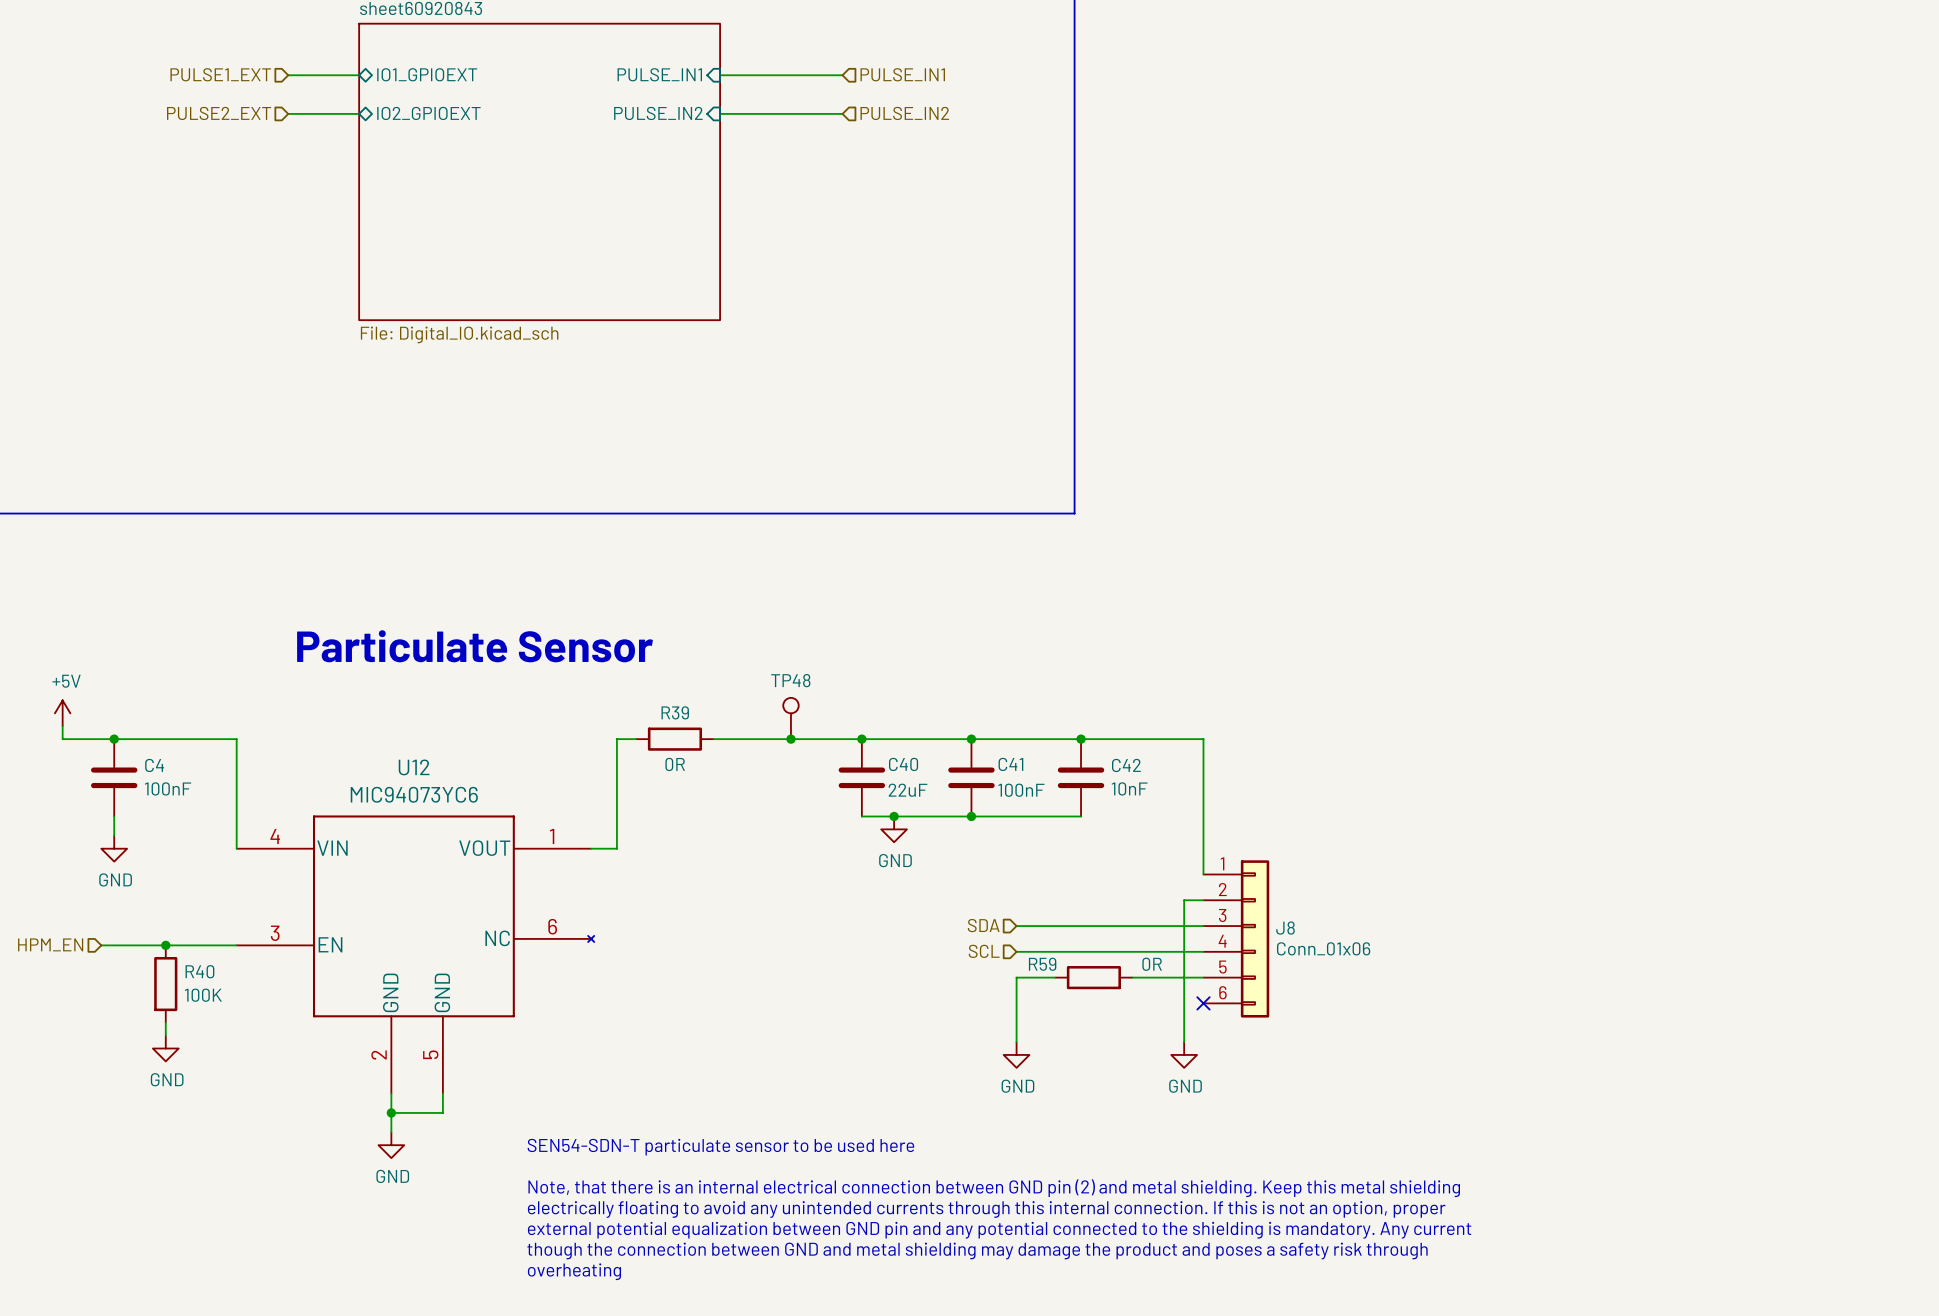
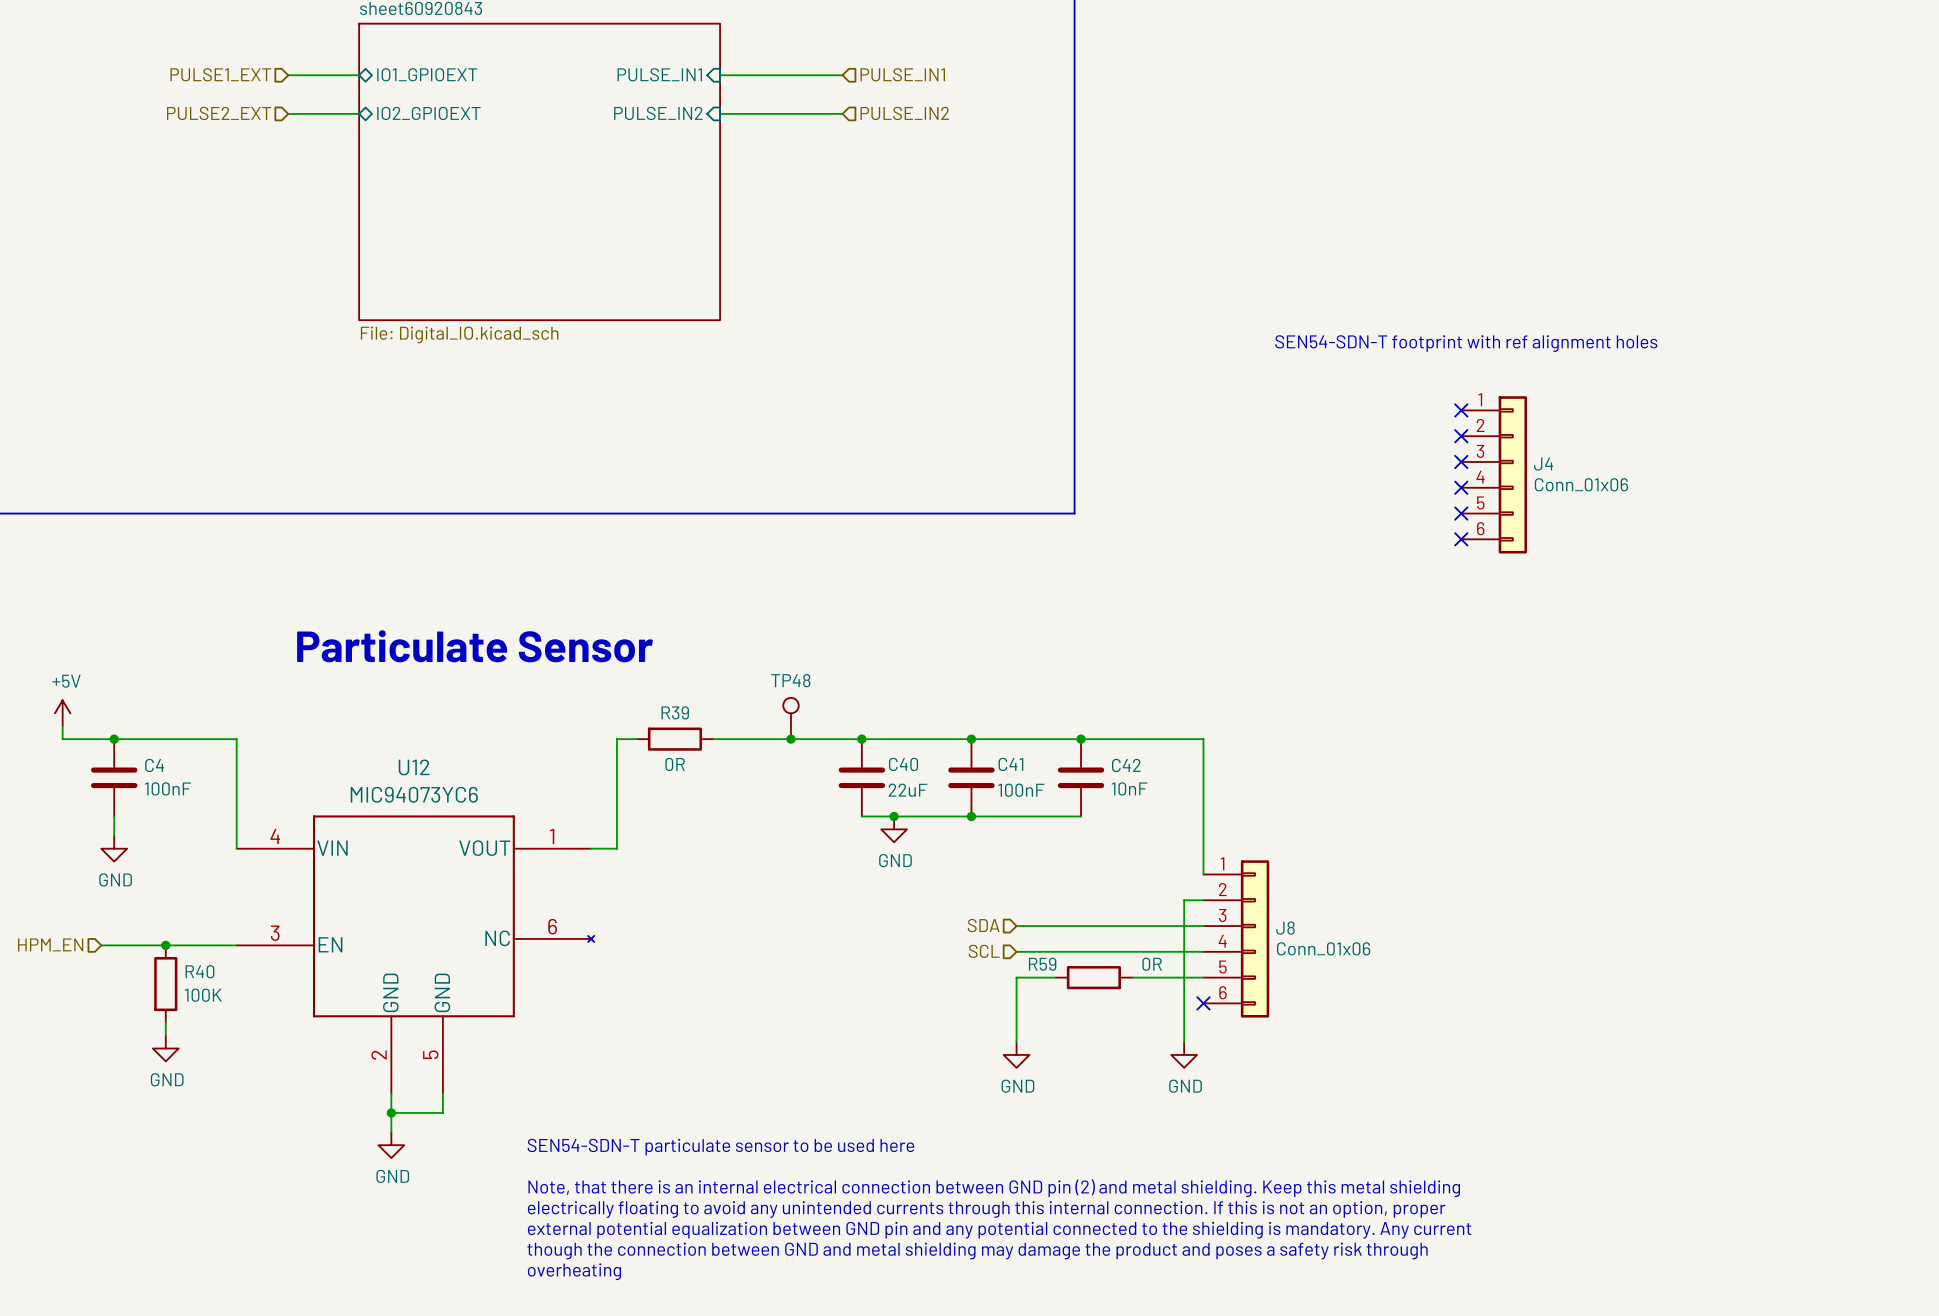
text: none -> SEN54-SDN-T footprint with ref alignment holes (1466, 343)
no-connect mark: none -> (1461, 410)
no-connect mark: none -> (1461, 436)
no-connect mark: none -> (1461, 461)
J4: none -> Conn_01x06 (1494, 474)
no-connect mark: none -> (1461, 487)
no-connect mark: none -> (1461, 513)
no-connect mark: none -> (1461, 539)

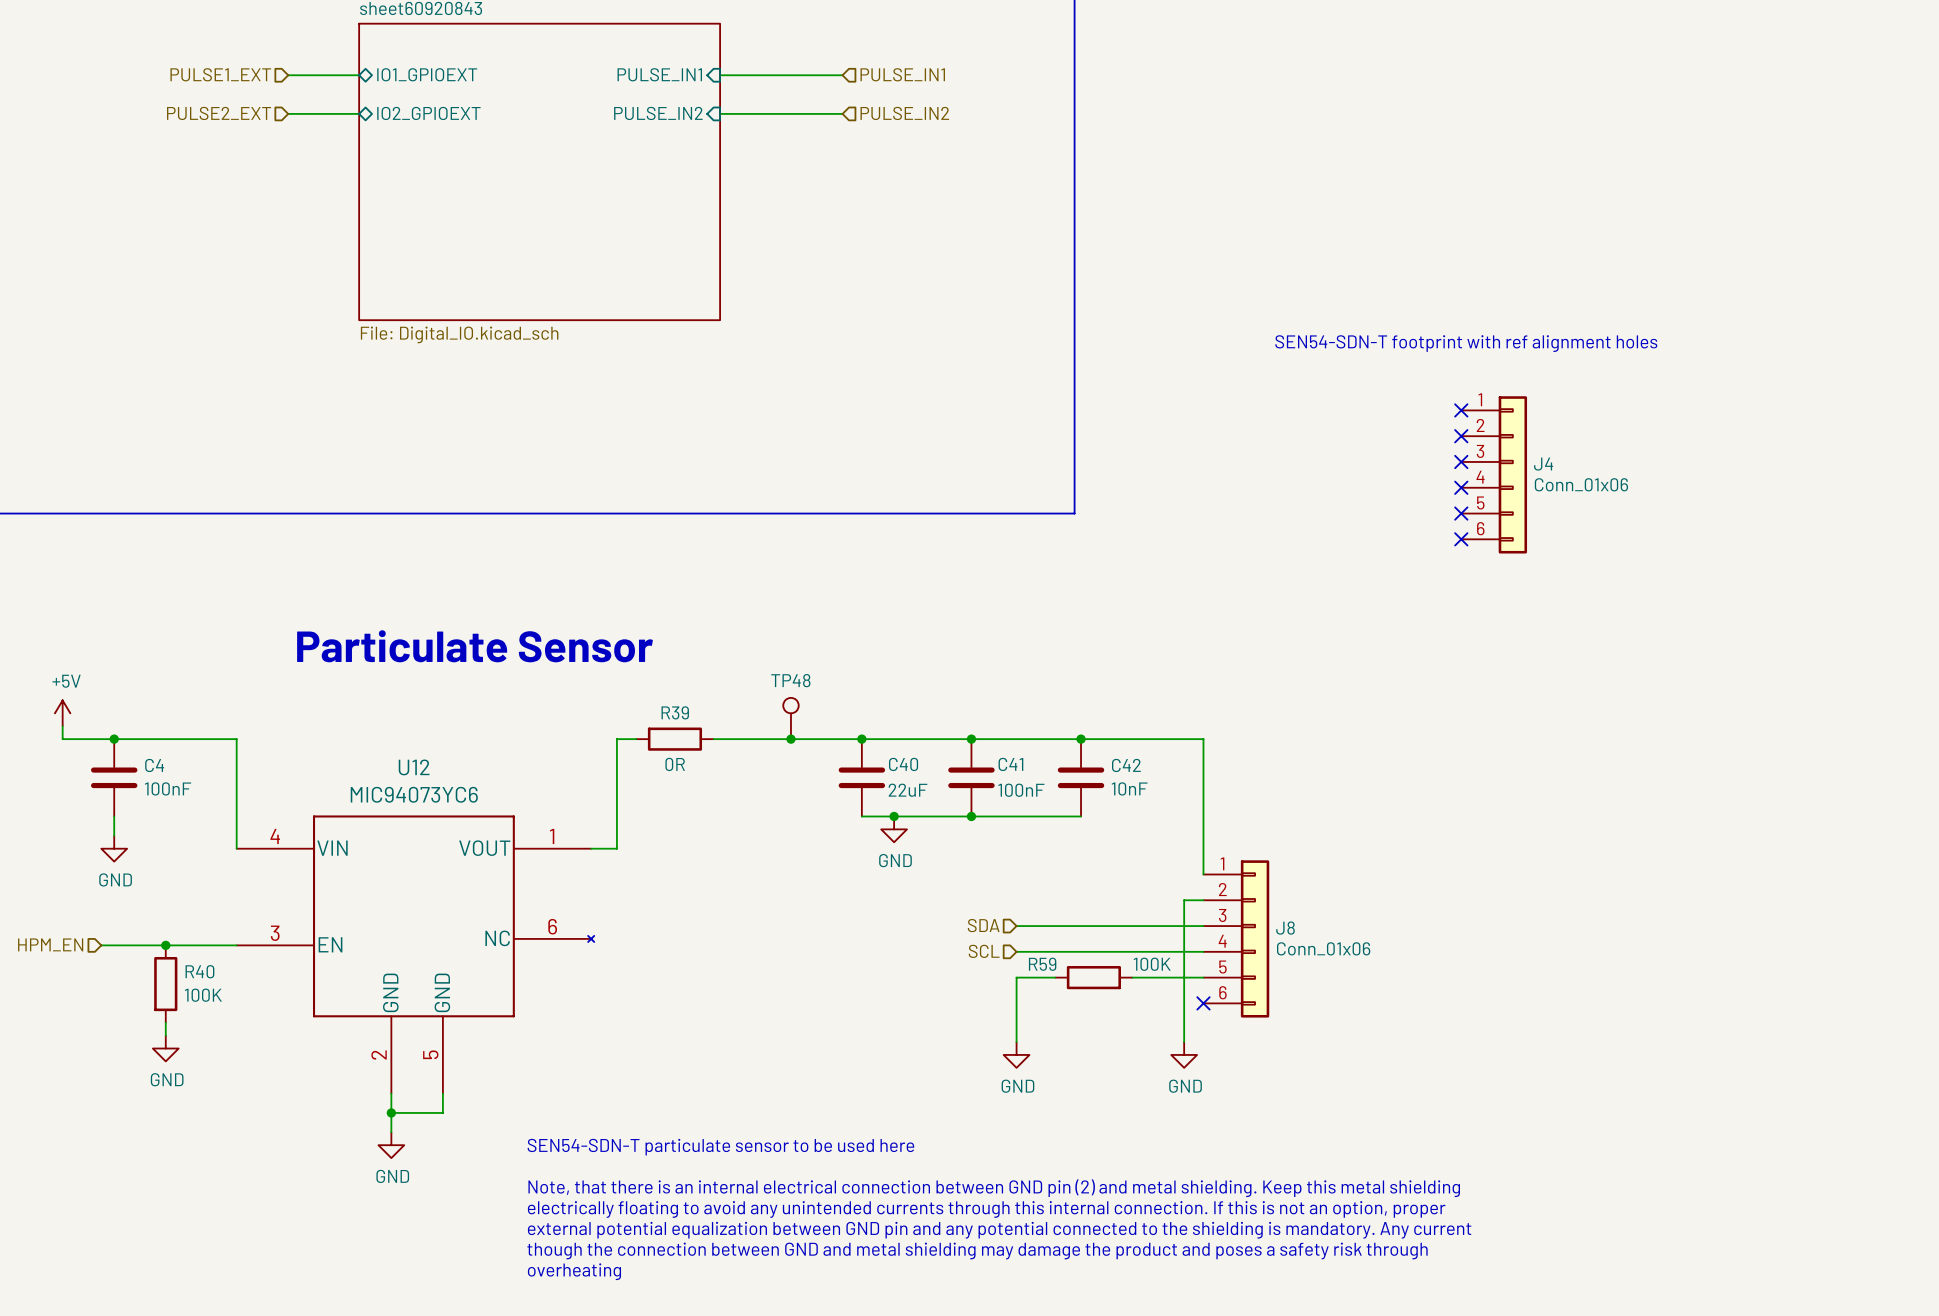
R59 value: 0R (1152, 964) -> 100K (1152, 964)

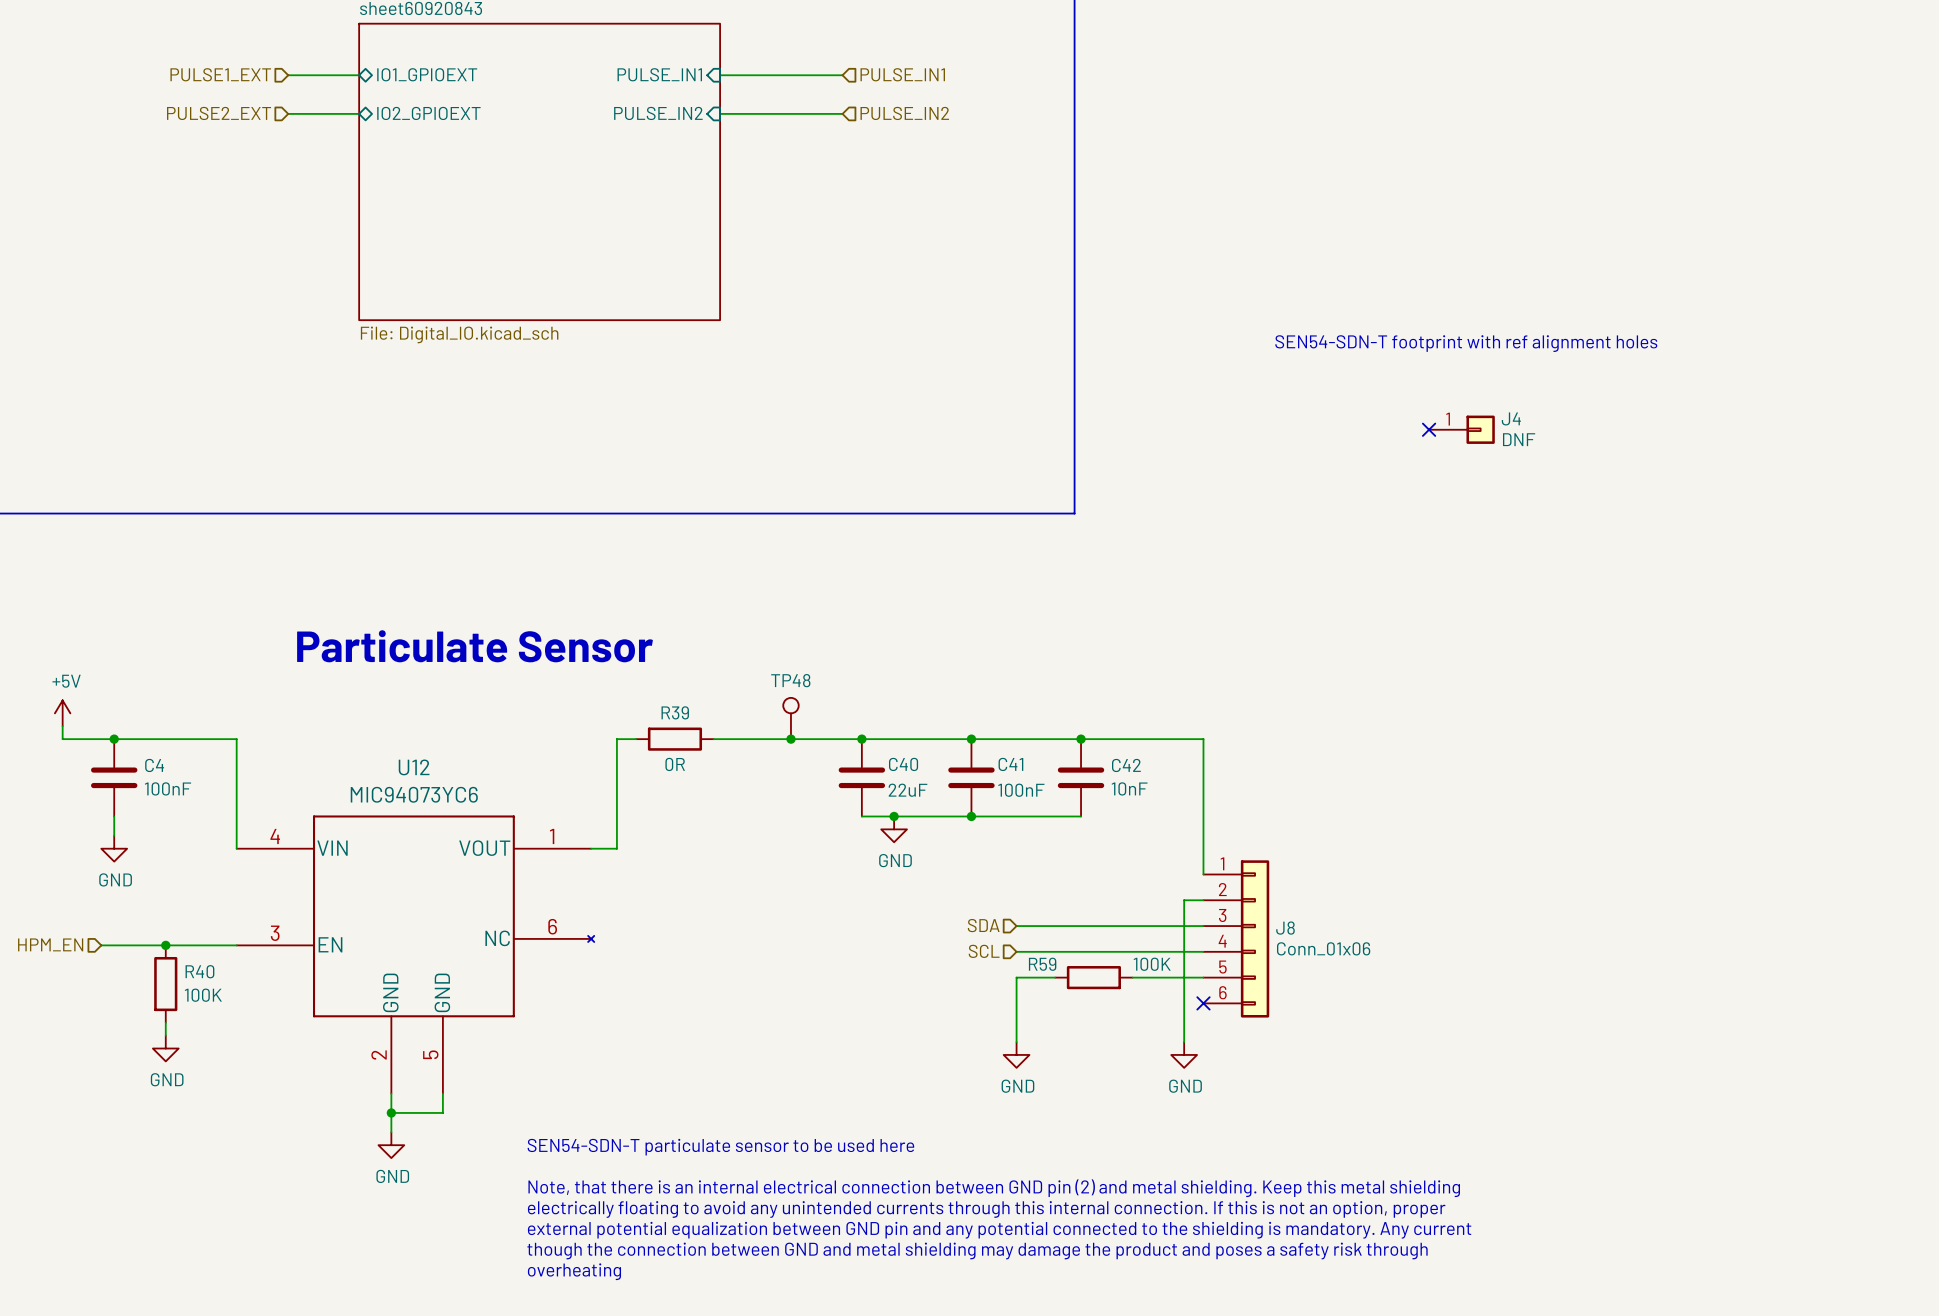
J4 symbol: [1461, 396, 1528, 554] -> [1429, 415, 1495, 444]
no-connect mark: (1461, 410) -> none
no-connect mark: none -> (1429, 429)
no-connect mark: (1461, 436) -> none
no-connect mark: (1461, 461) -> none
J4 value: Conn_01x06 (1581, 484) -> DNF (1519, 439)
no-connect mark: (1461, 487) -> none
no-connect mark: (1461, 513) -> none
no-connect mark: (1461, 539) -> none

